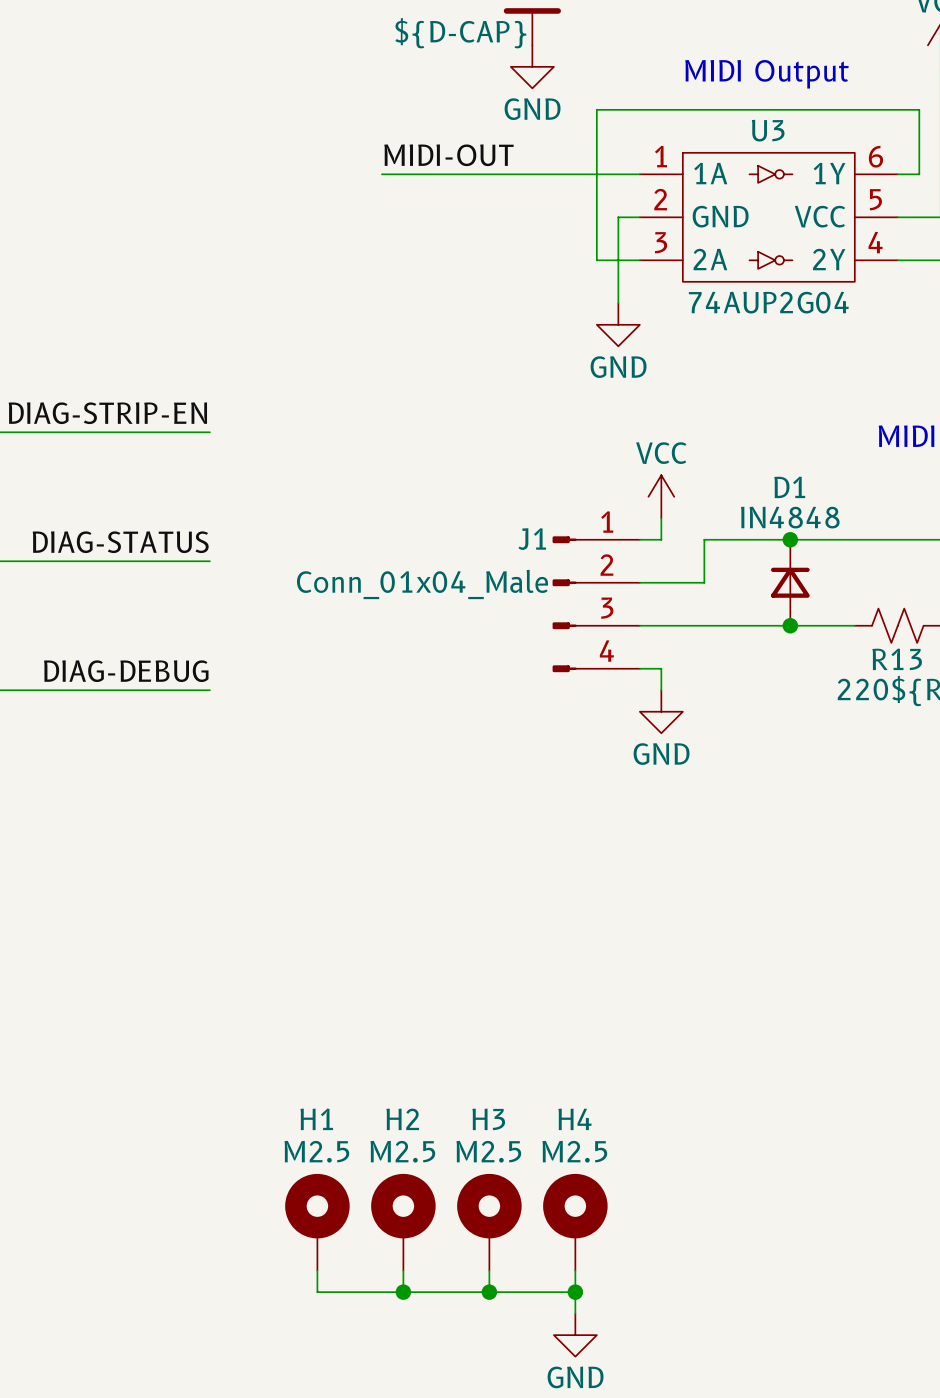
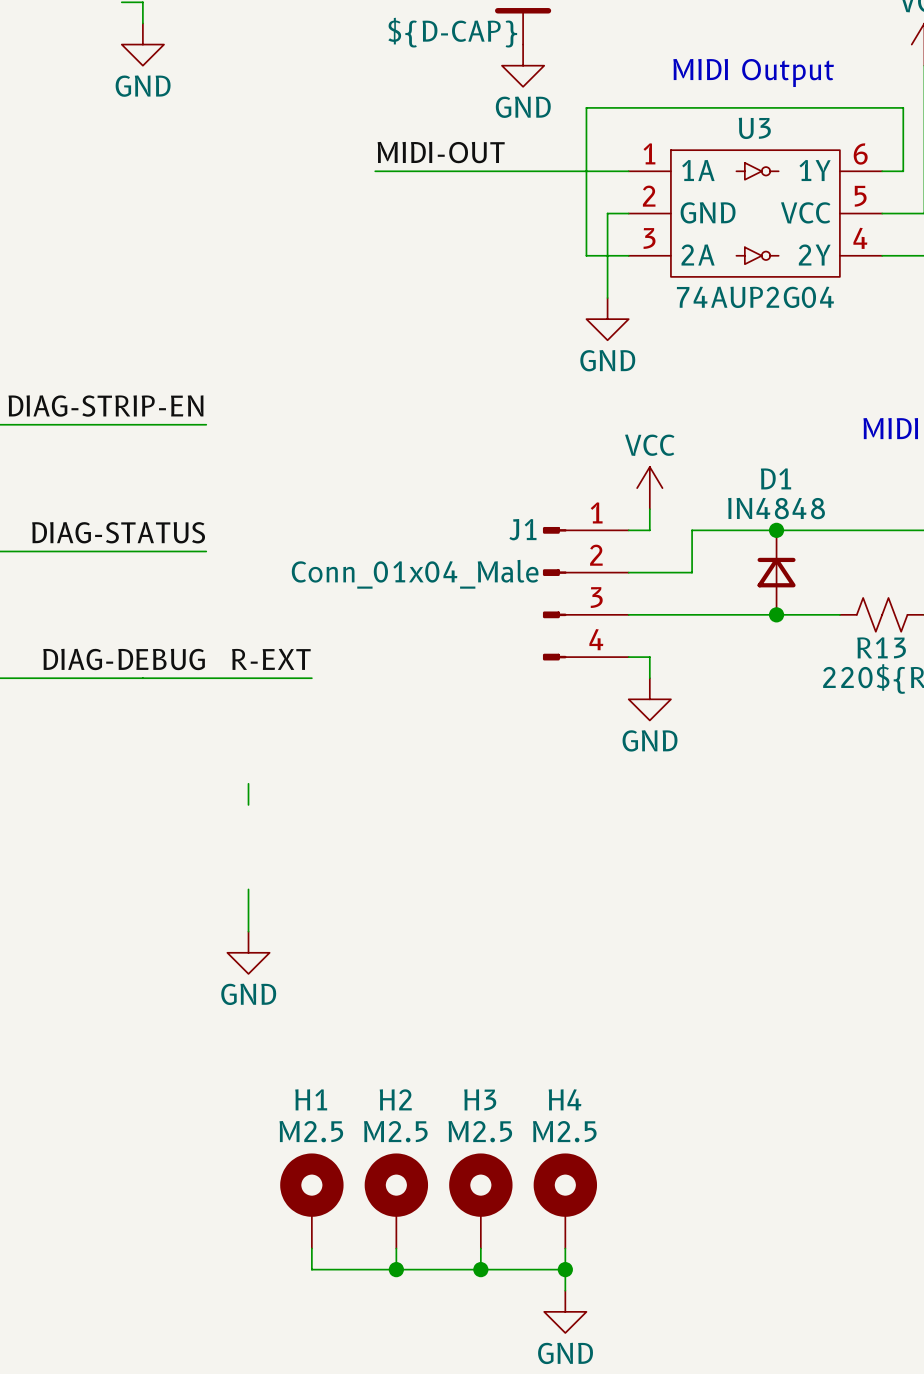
wire: none -> (121, 2) (142, 2) (142, 23)
power symbol: none -> GND (142, 44)
label: none -> R-EXT (271, 659)
wire: none -> (206, 678) (311, 678)
wire: none -> (248, 783) (248, 804)
wire: none -> (248, 889) (248, 931)
power symbol: none -> GND (248, 952)

